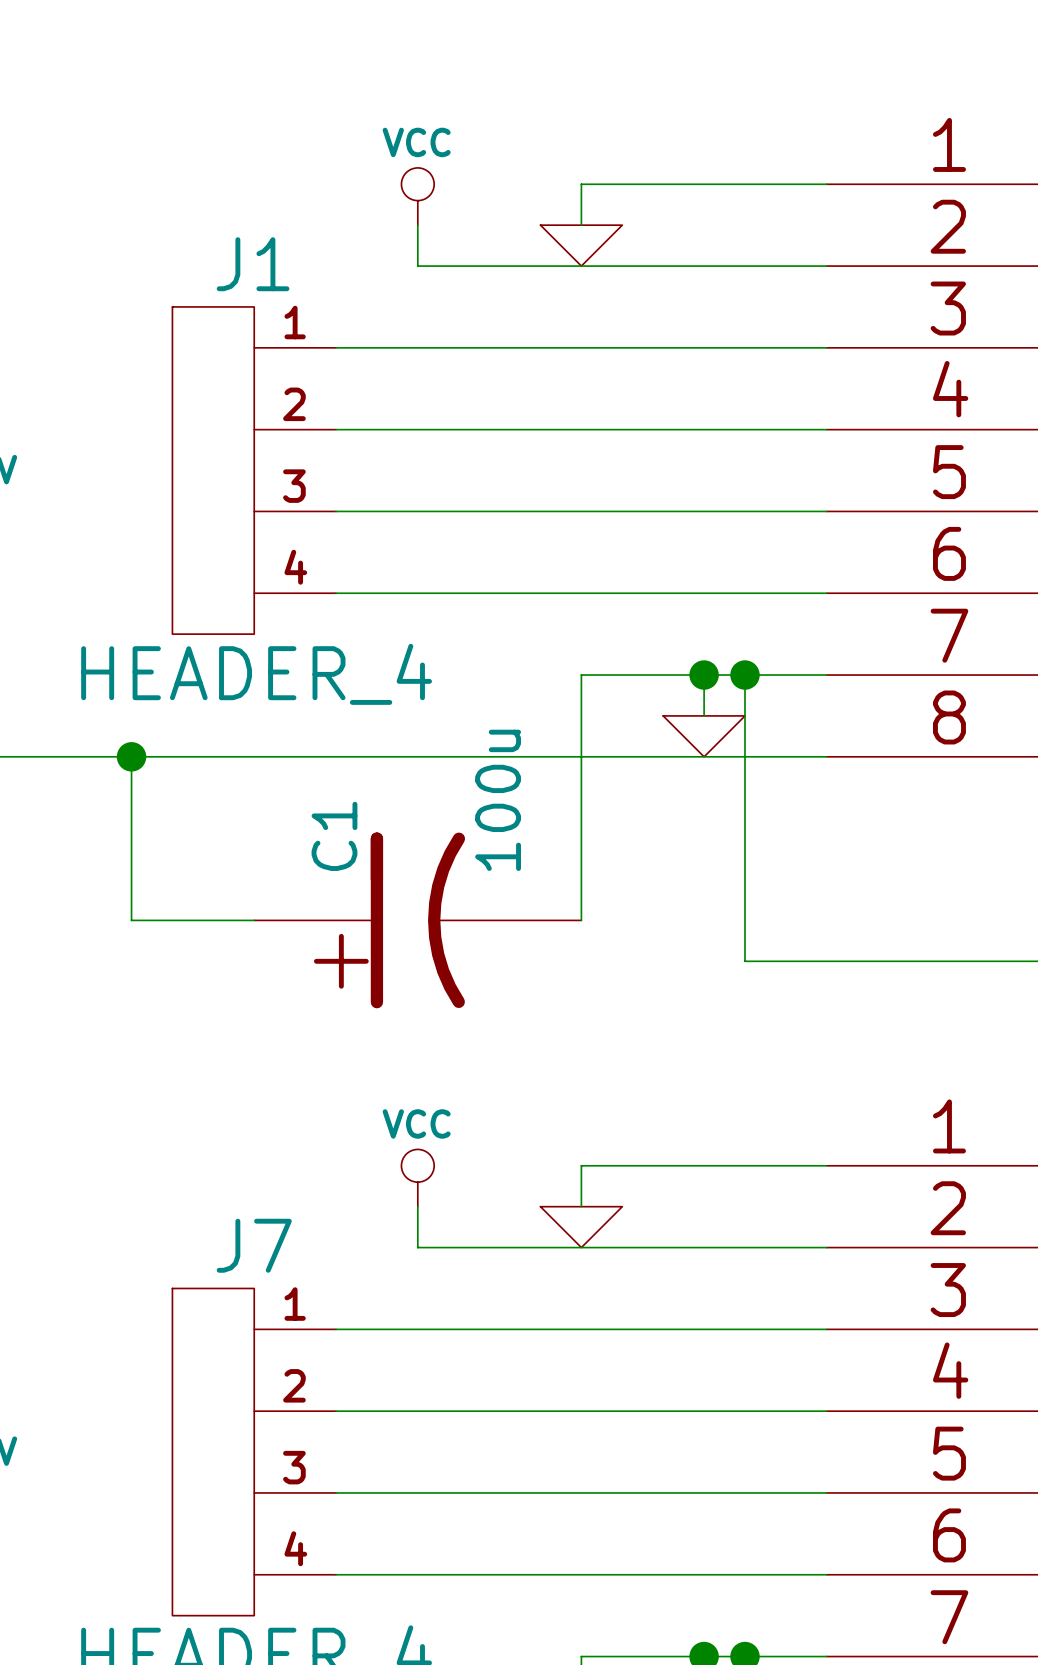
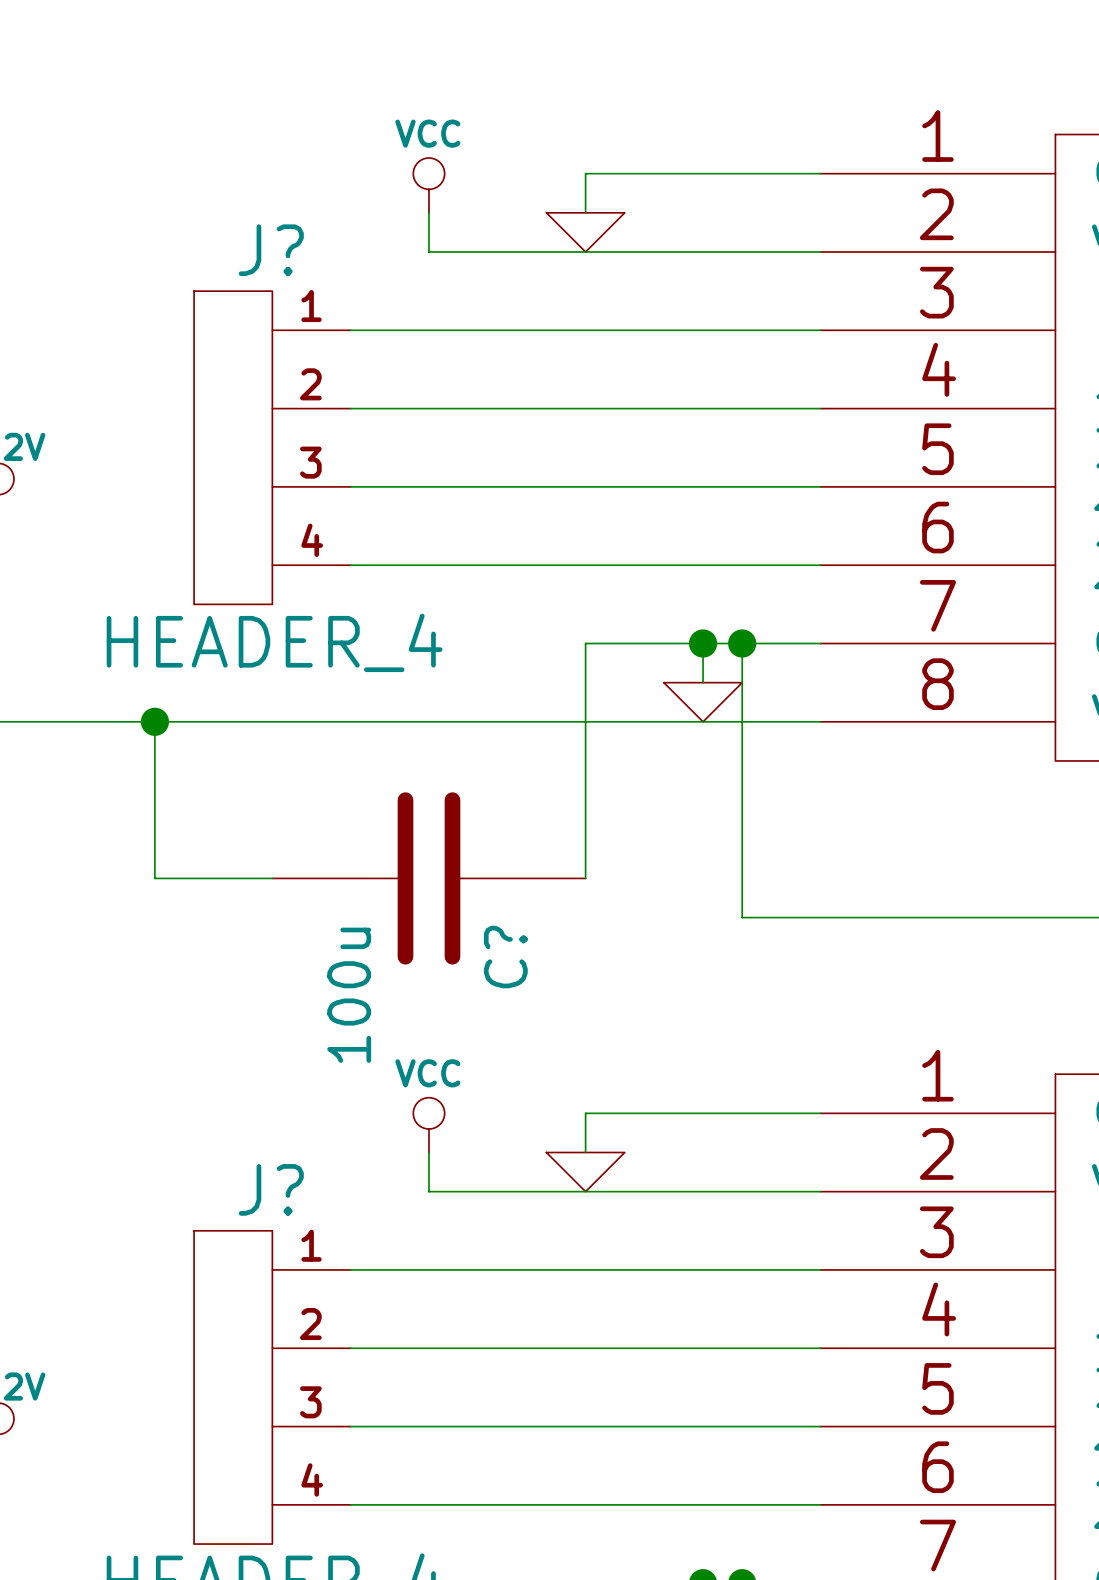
J1 name: J1 (253, 264) -> J? (271, 250)
C1: 100u (417, 920) -> none
C?: none -> 100u (428, 878)
J7 name: J7 (254, 1245) -> J? (271, 1189)

